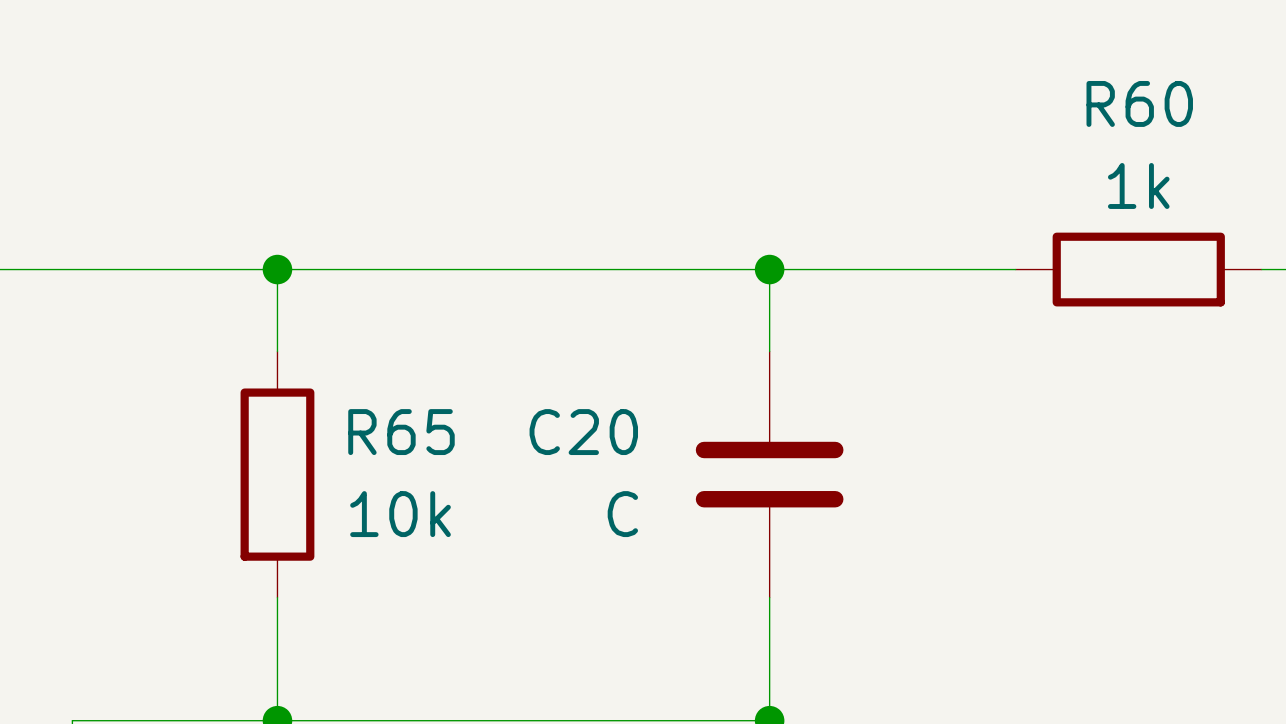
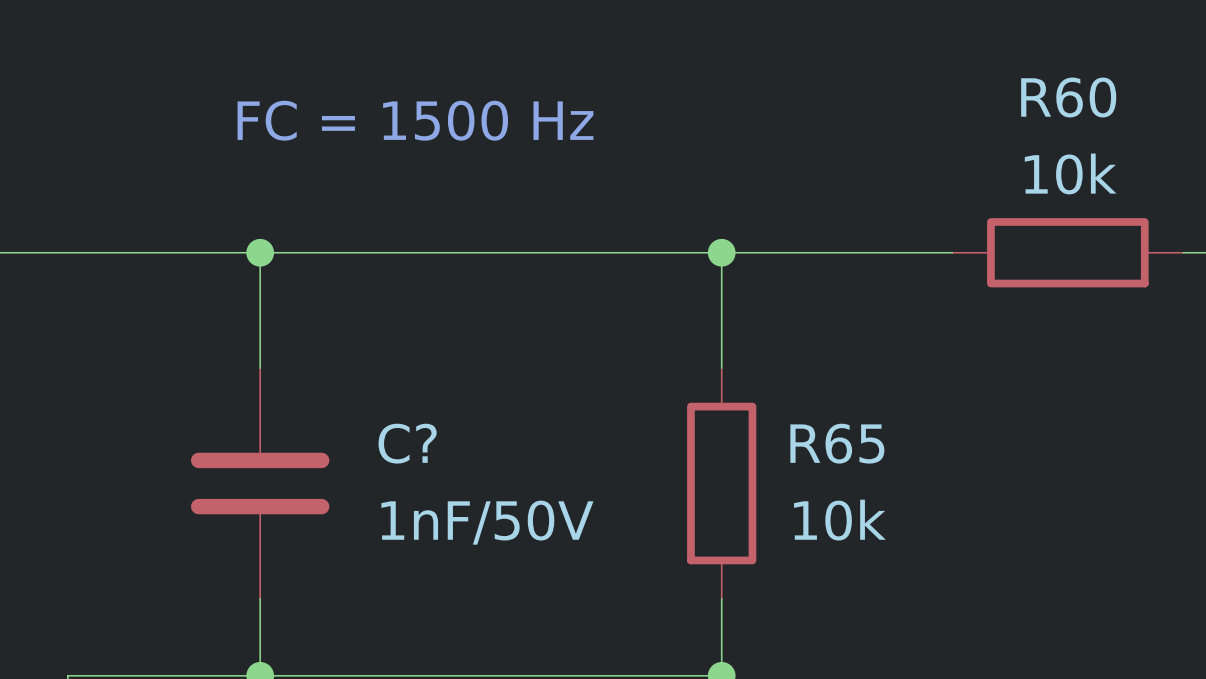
text: none -> FC = 1500 Hz (415, 120)
R60 value: 1k (1138, 185) -> 10k (1070, 173)
R65 position: (277, 474) -> (721, 483)
C20: C (769, 474) -> none
C?: none -> 1nF/50V (260, 483)

